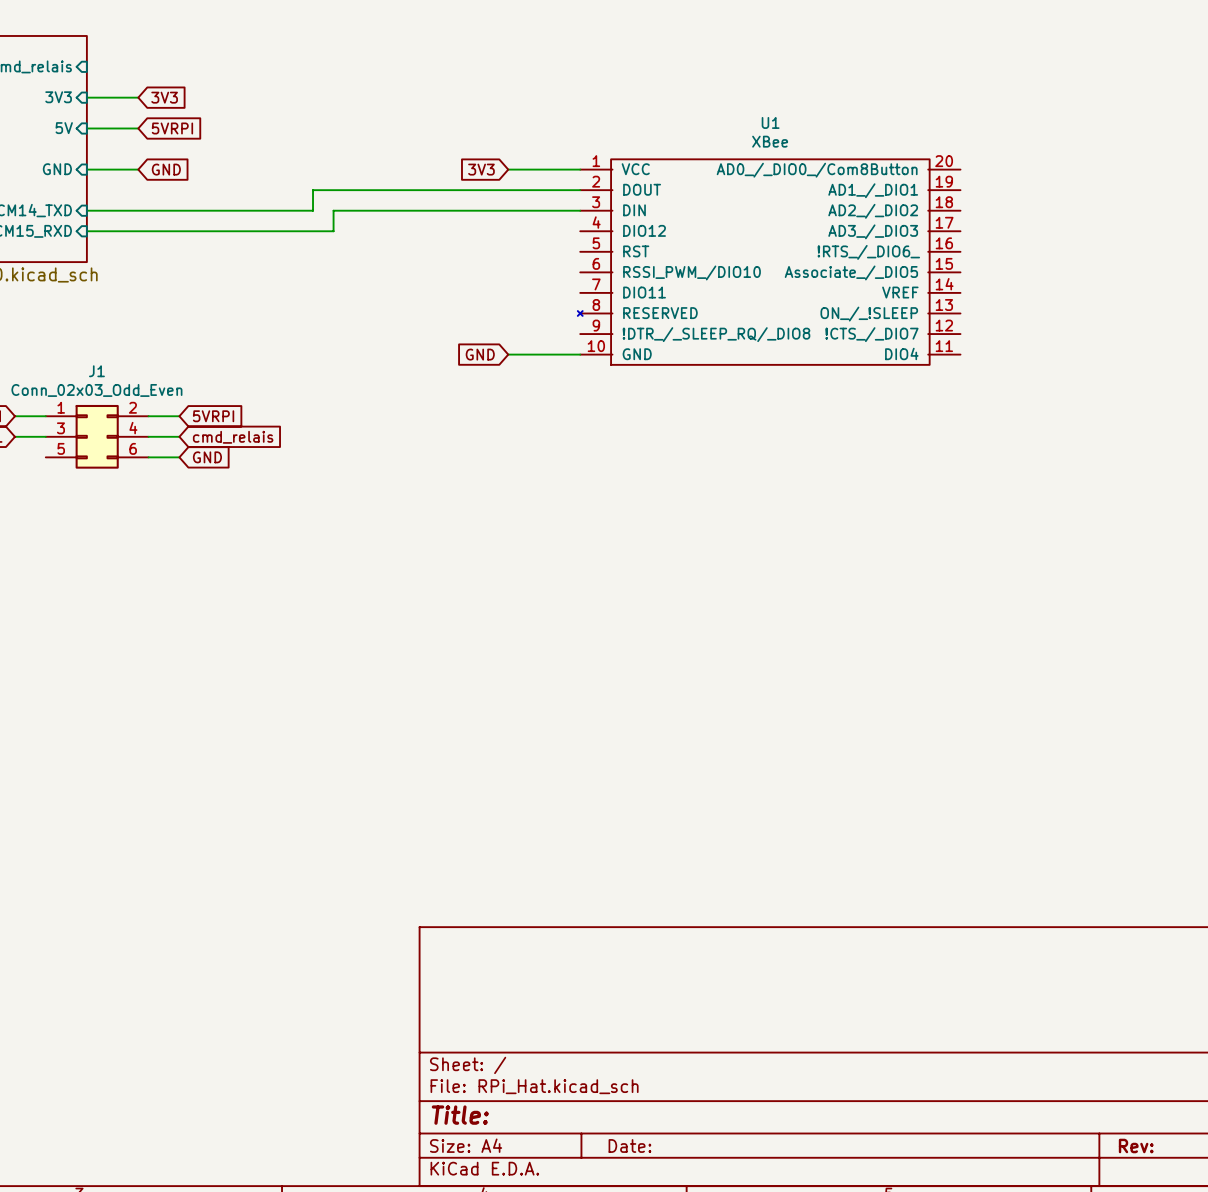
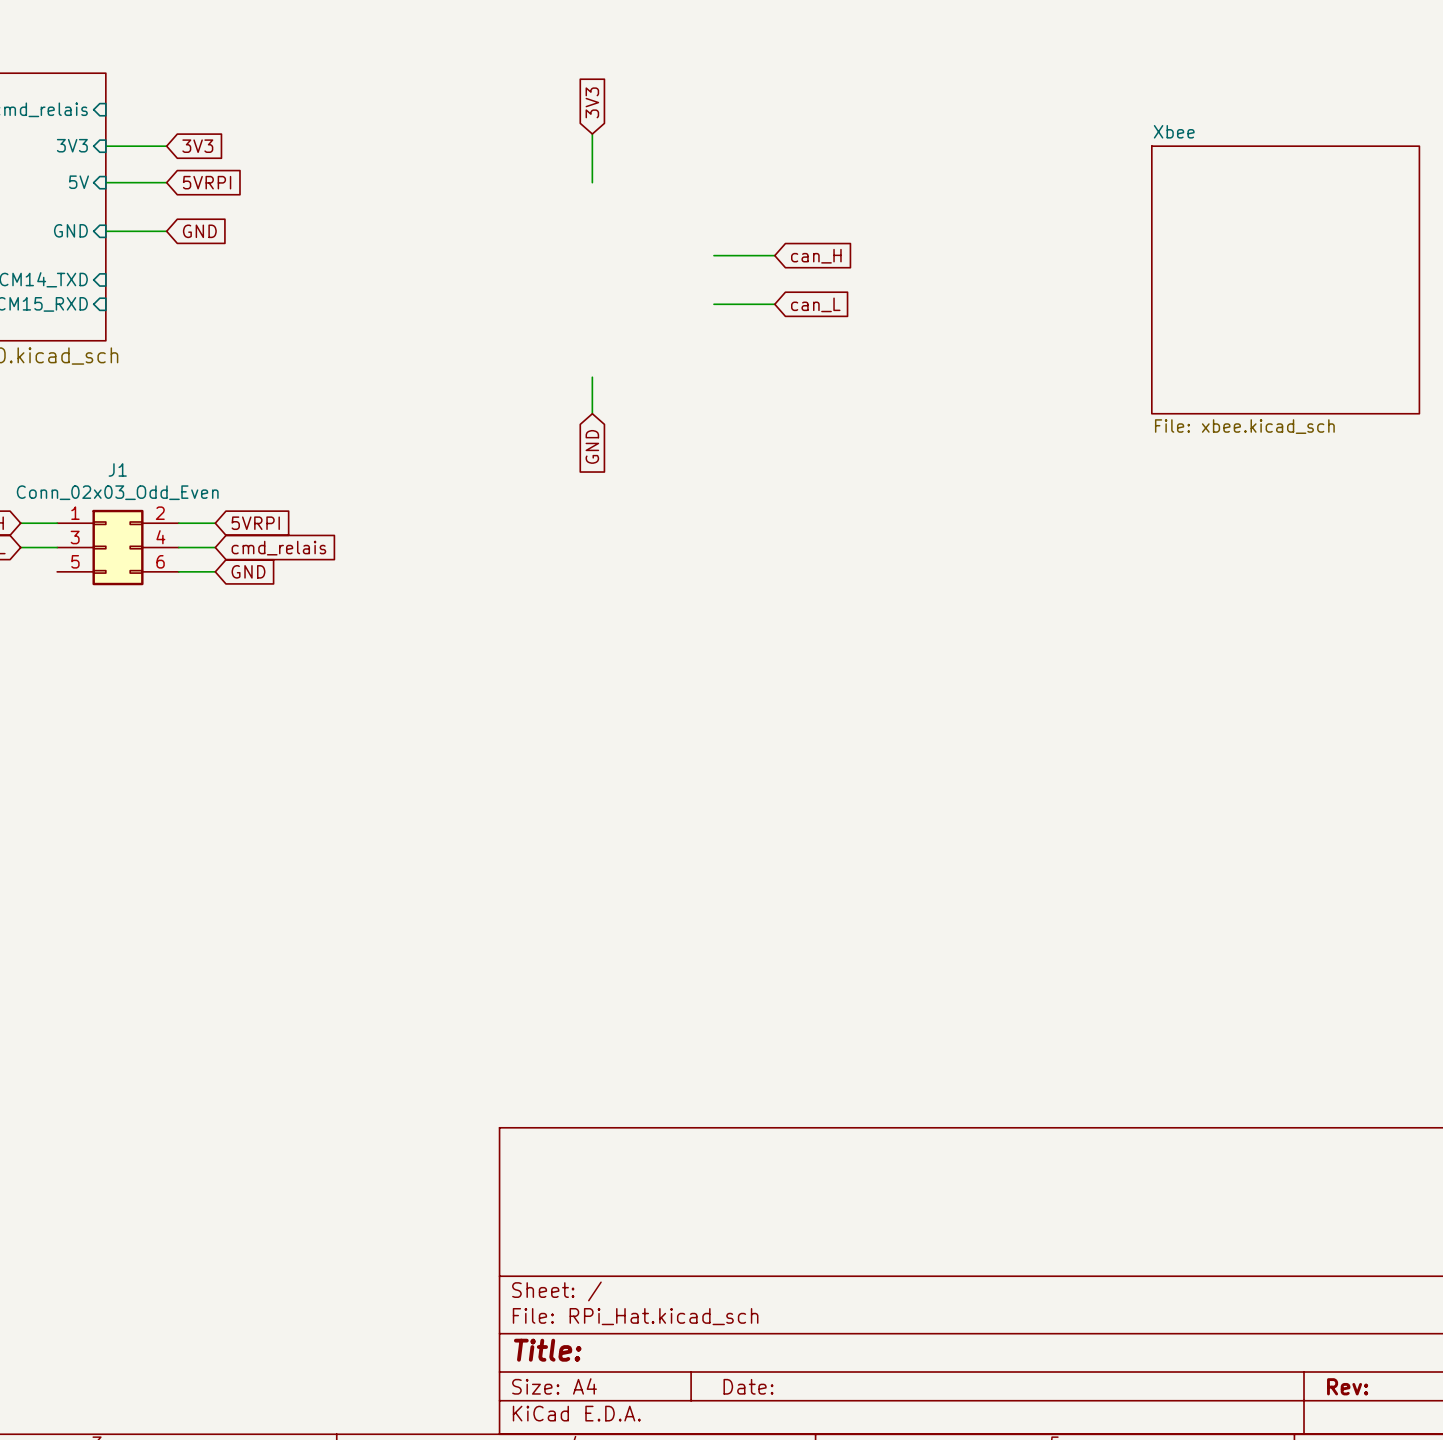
wire: none -> (592, 134) (592, 182)
global label rotation: 0° (481, 169) -> 90° clockwise (592, 102)
global label position: 3V3 (481, 169) -> 3V3 (592, 102)
wire: (508, 169) (580, 169) -> none
wire: (580, 190) (313, 190) (313, 210) (86, 210) -> none
wire: none -> (713, 255) (774, 255)
global label: none -> can_H (816, 256)
wire: (580, 210) (333, 210) (333, 231) (86, 231) -> none
sheet Xbee: none -> File: xbee.kicad_sch (1285, 279)
wire: none -> (713, 304) (774, 304)
global label: none -> can_L (815, 304)
U1: XBee (769, 262) -> none
wire: none -> (592, 377) (592, 413)
global label rotation: 0° (480, 354) -> 90° counterclockwise (592, 446)
wire: (508, 354) (580, 354) -> none

